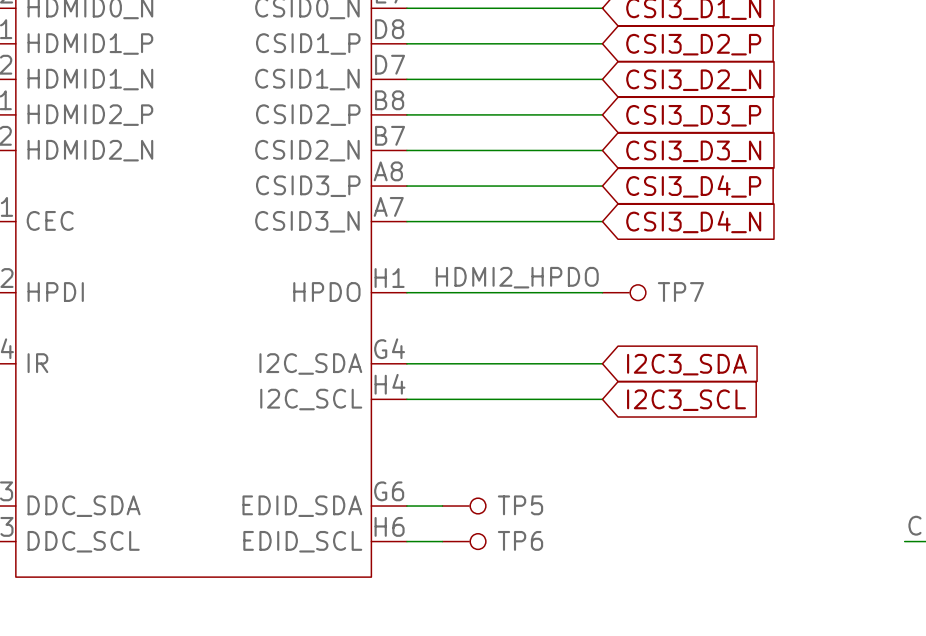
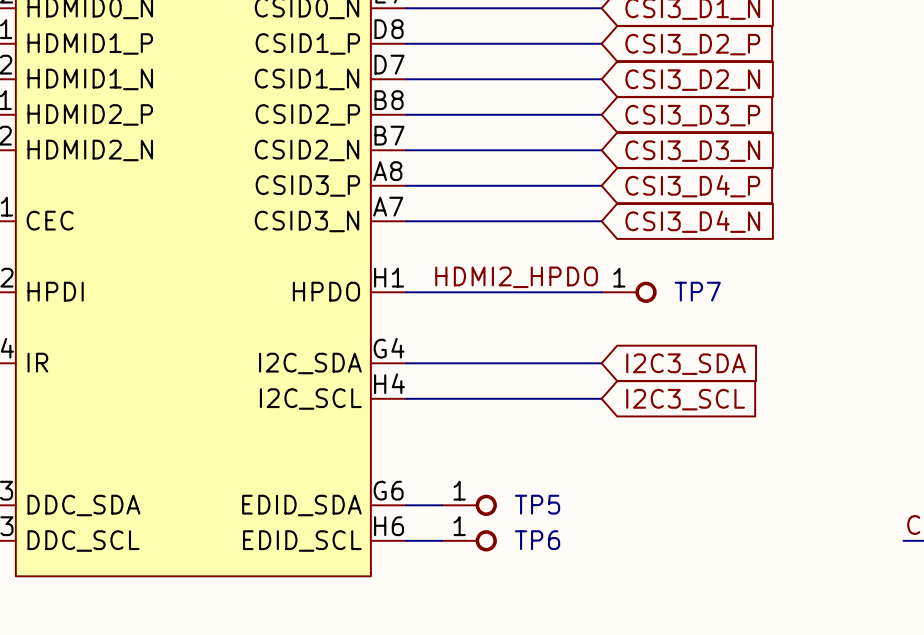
TP7 symbol: [602, 284, 646, 301] -> [601, 281, 657, 303]
TP5 symbol: [442, 498, 486, 514] -> [441, 494, 497, 516]
TP6 symbol: [442, 533, 486, 550] -> [441, 530, 497, 552]

